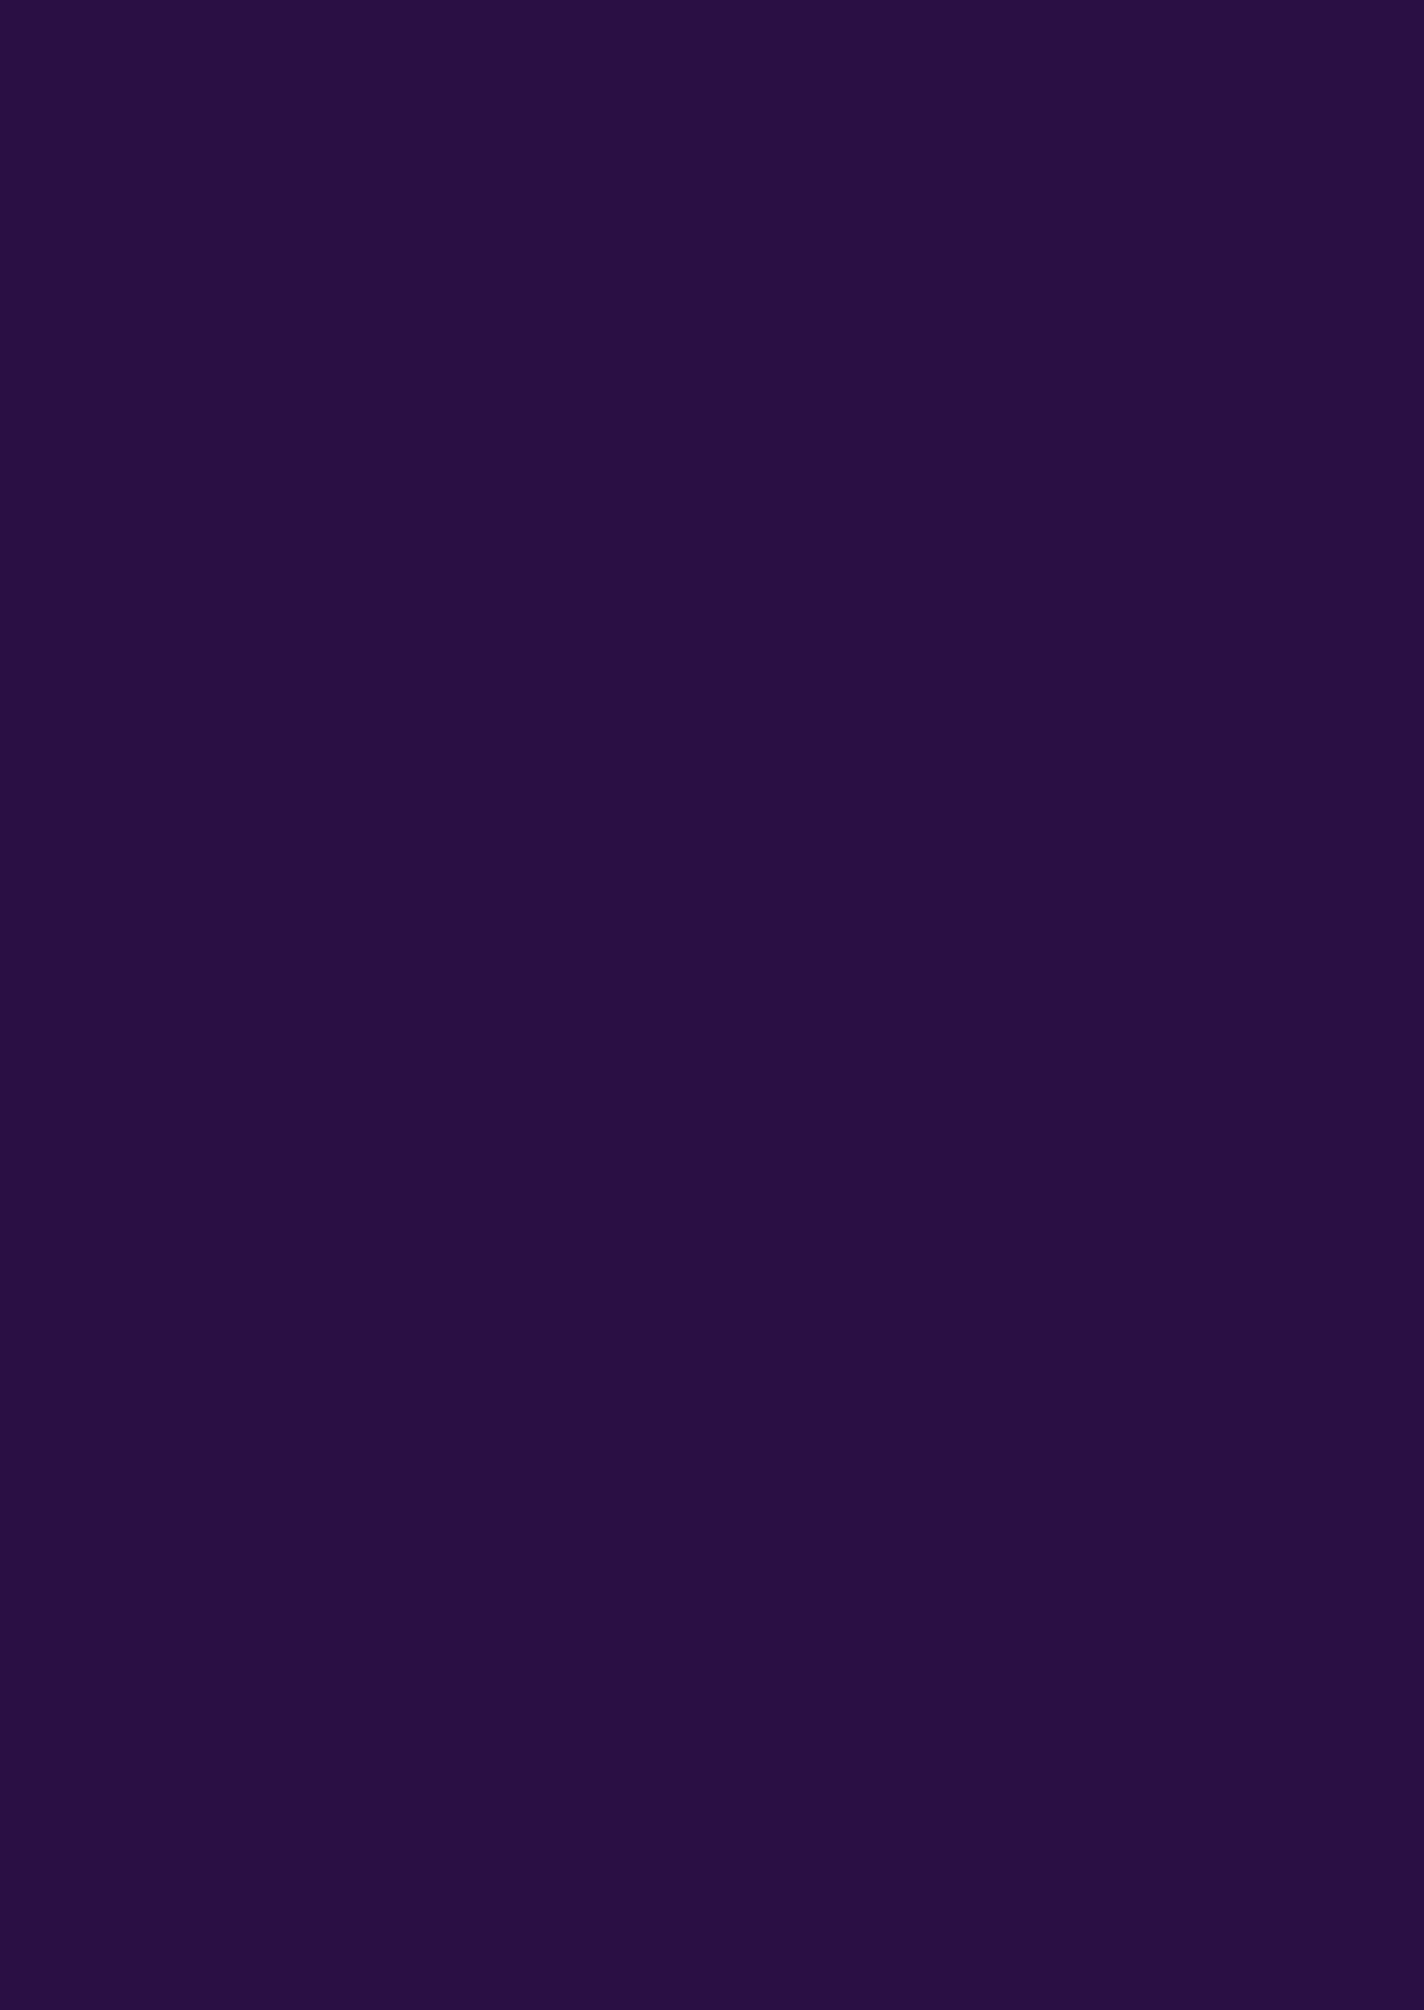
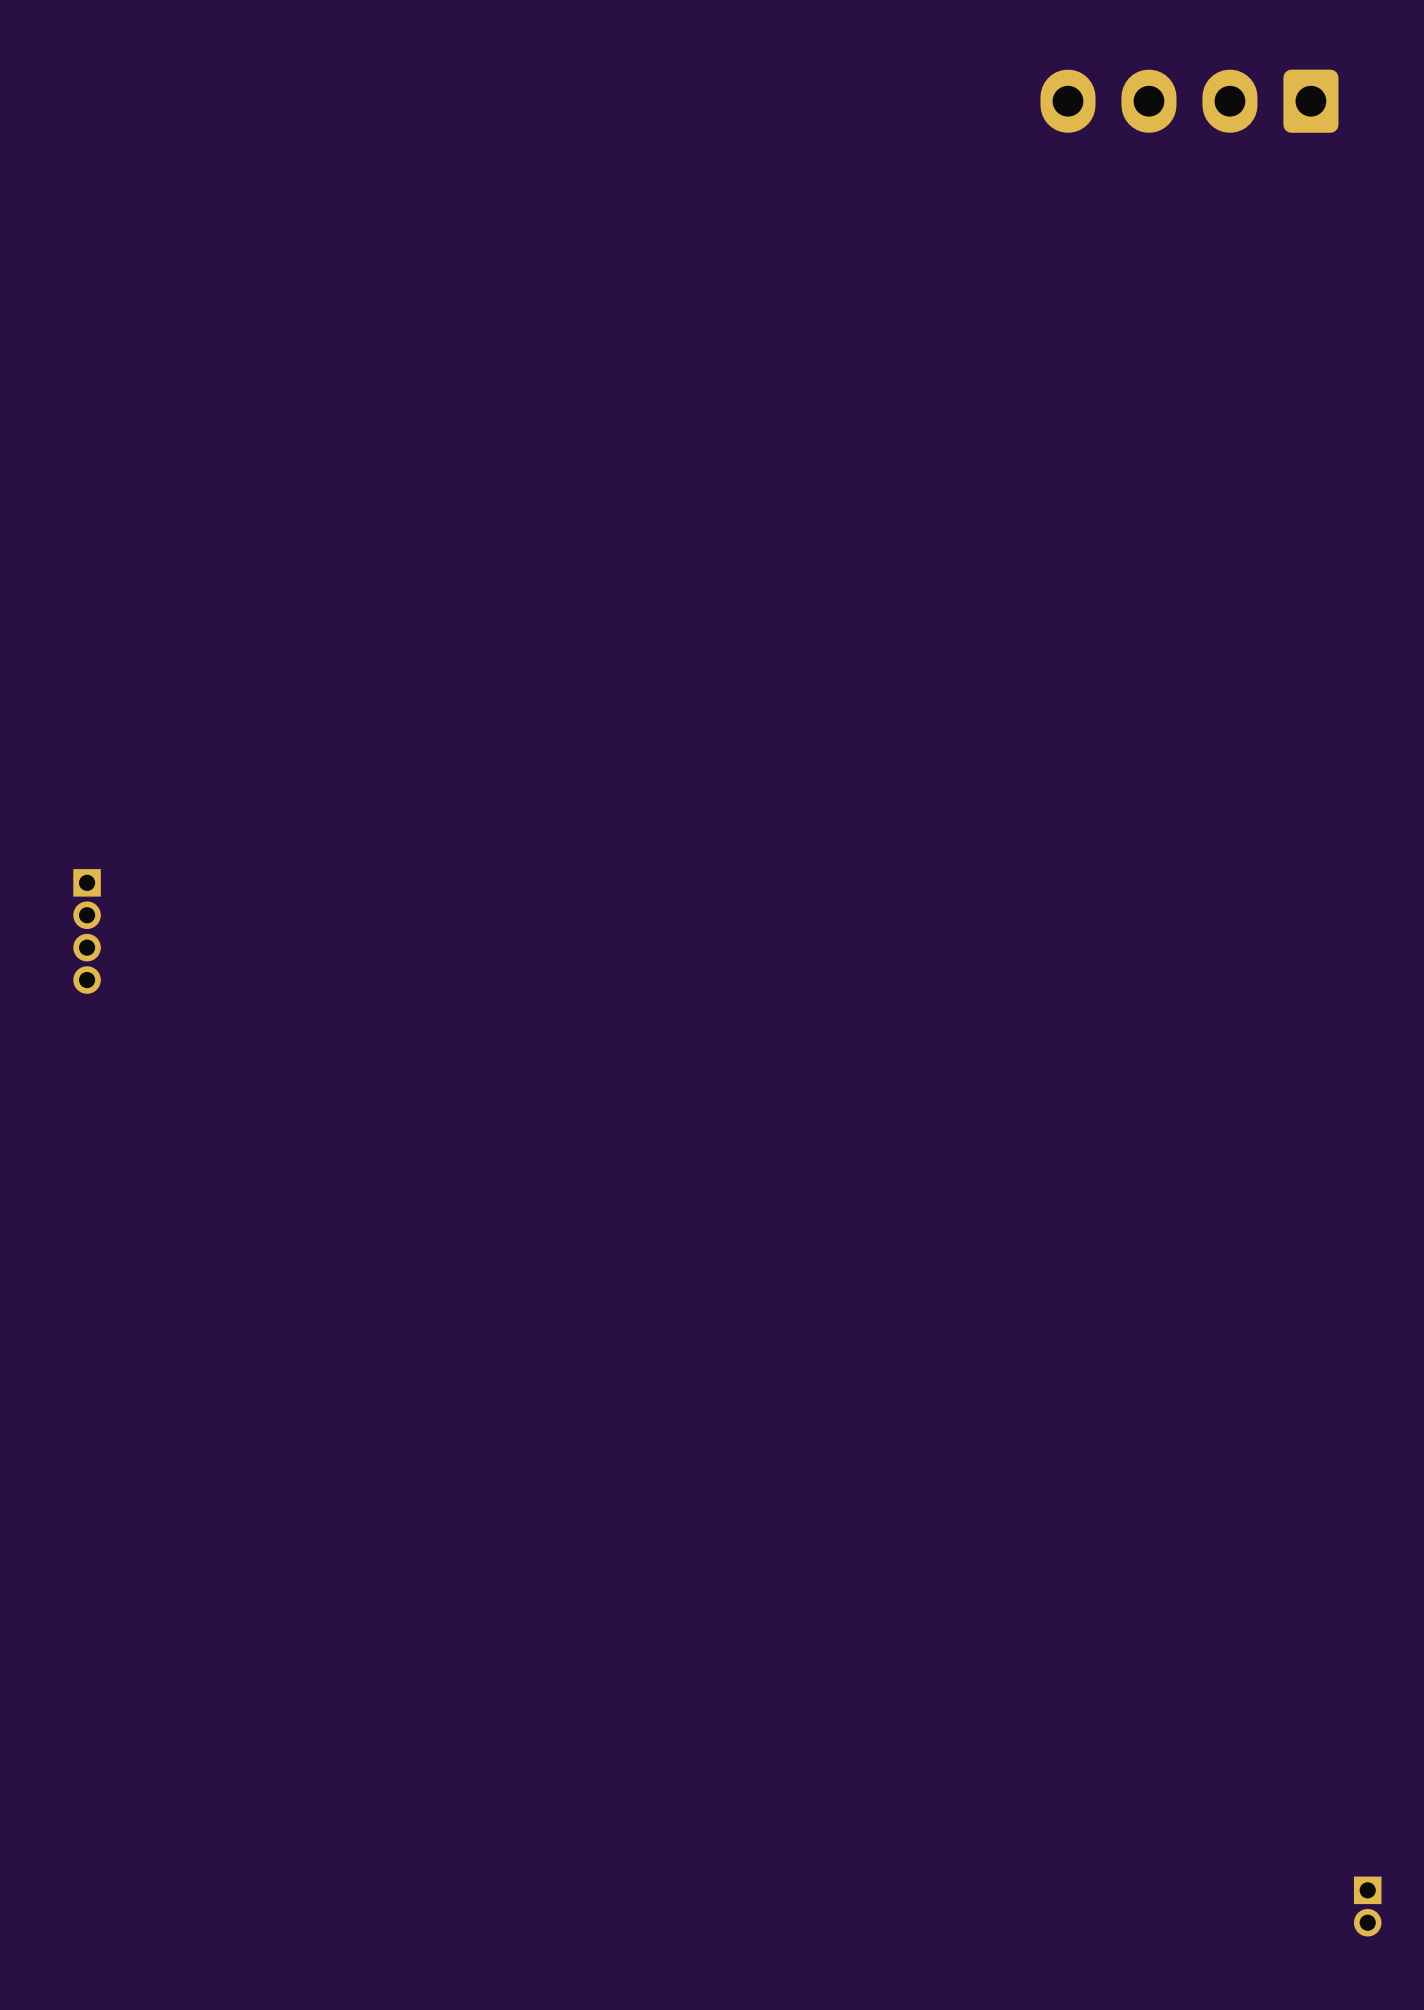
part: none -> (1189, 101)
part: none -> (87, 931)
part: none -> (1367, 1906)

